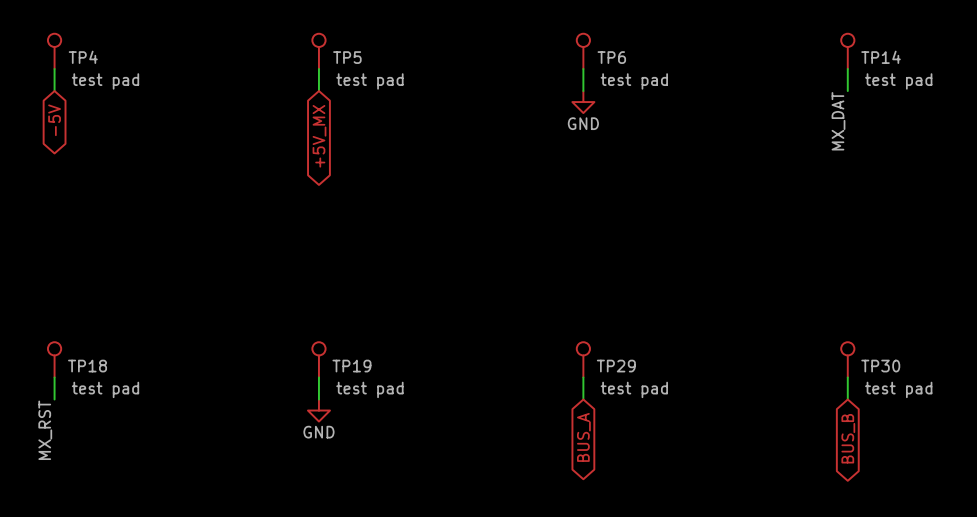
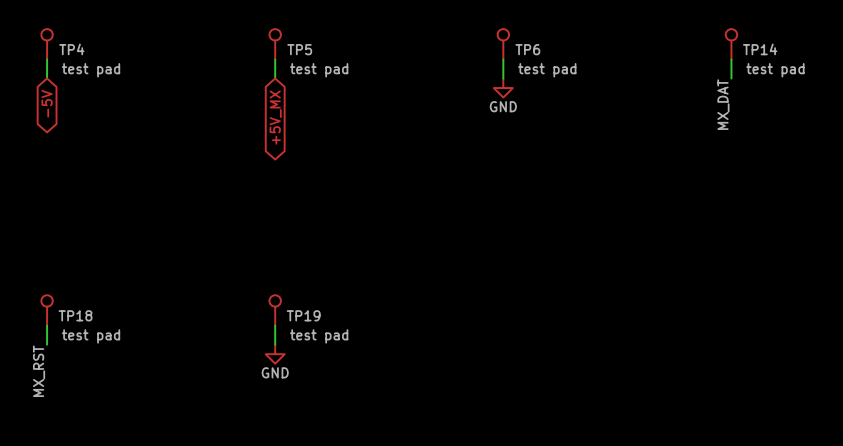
TP29: test pad (583, 359) -> none
TP30: test pad (847, 359) -> none
wire: (583, 377) (583, 399) -> none
wire: (847, 377) (847, 399) -> none
global label: BUS_A (583, 437) -> none
global label: BUS_B (848, 438) -> none

